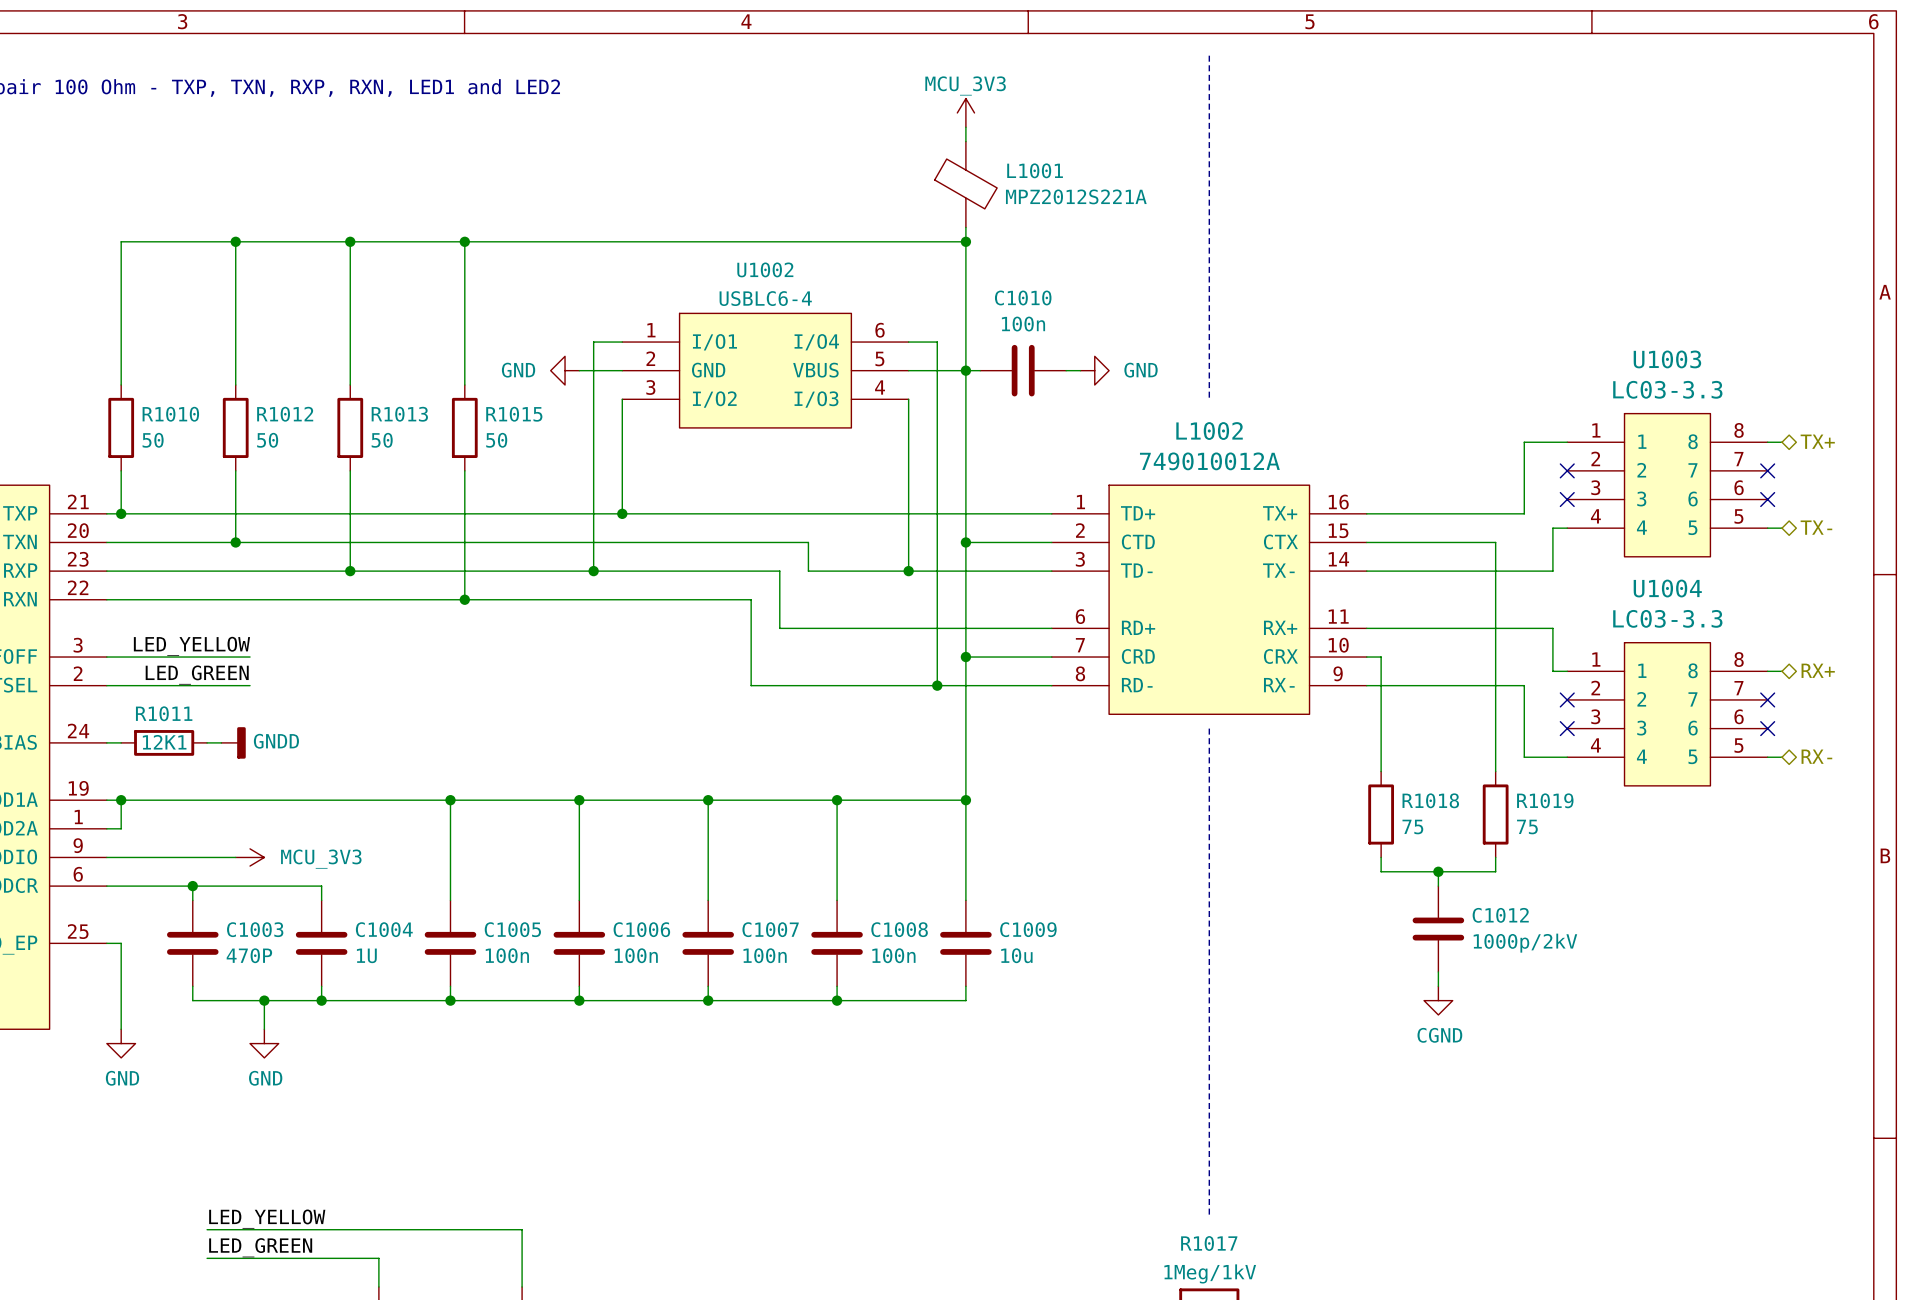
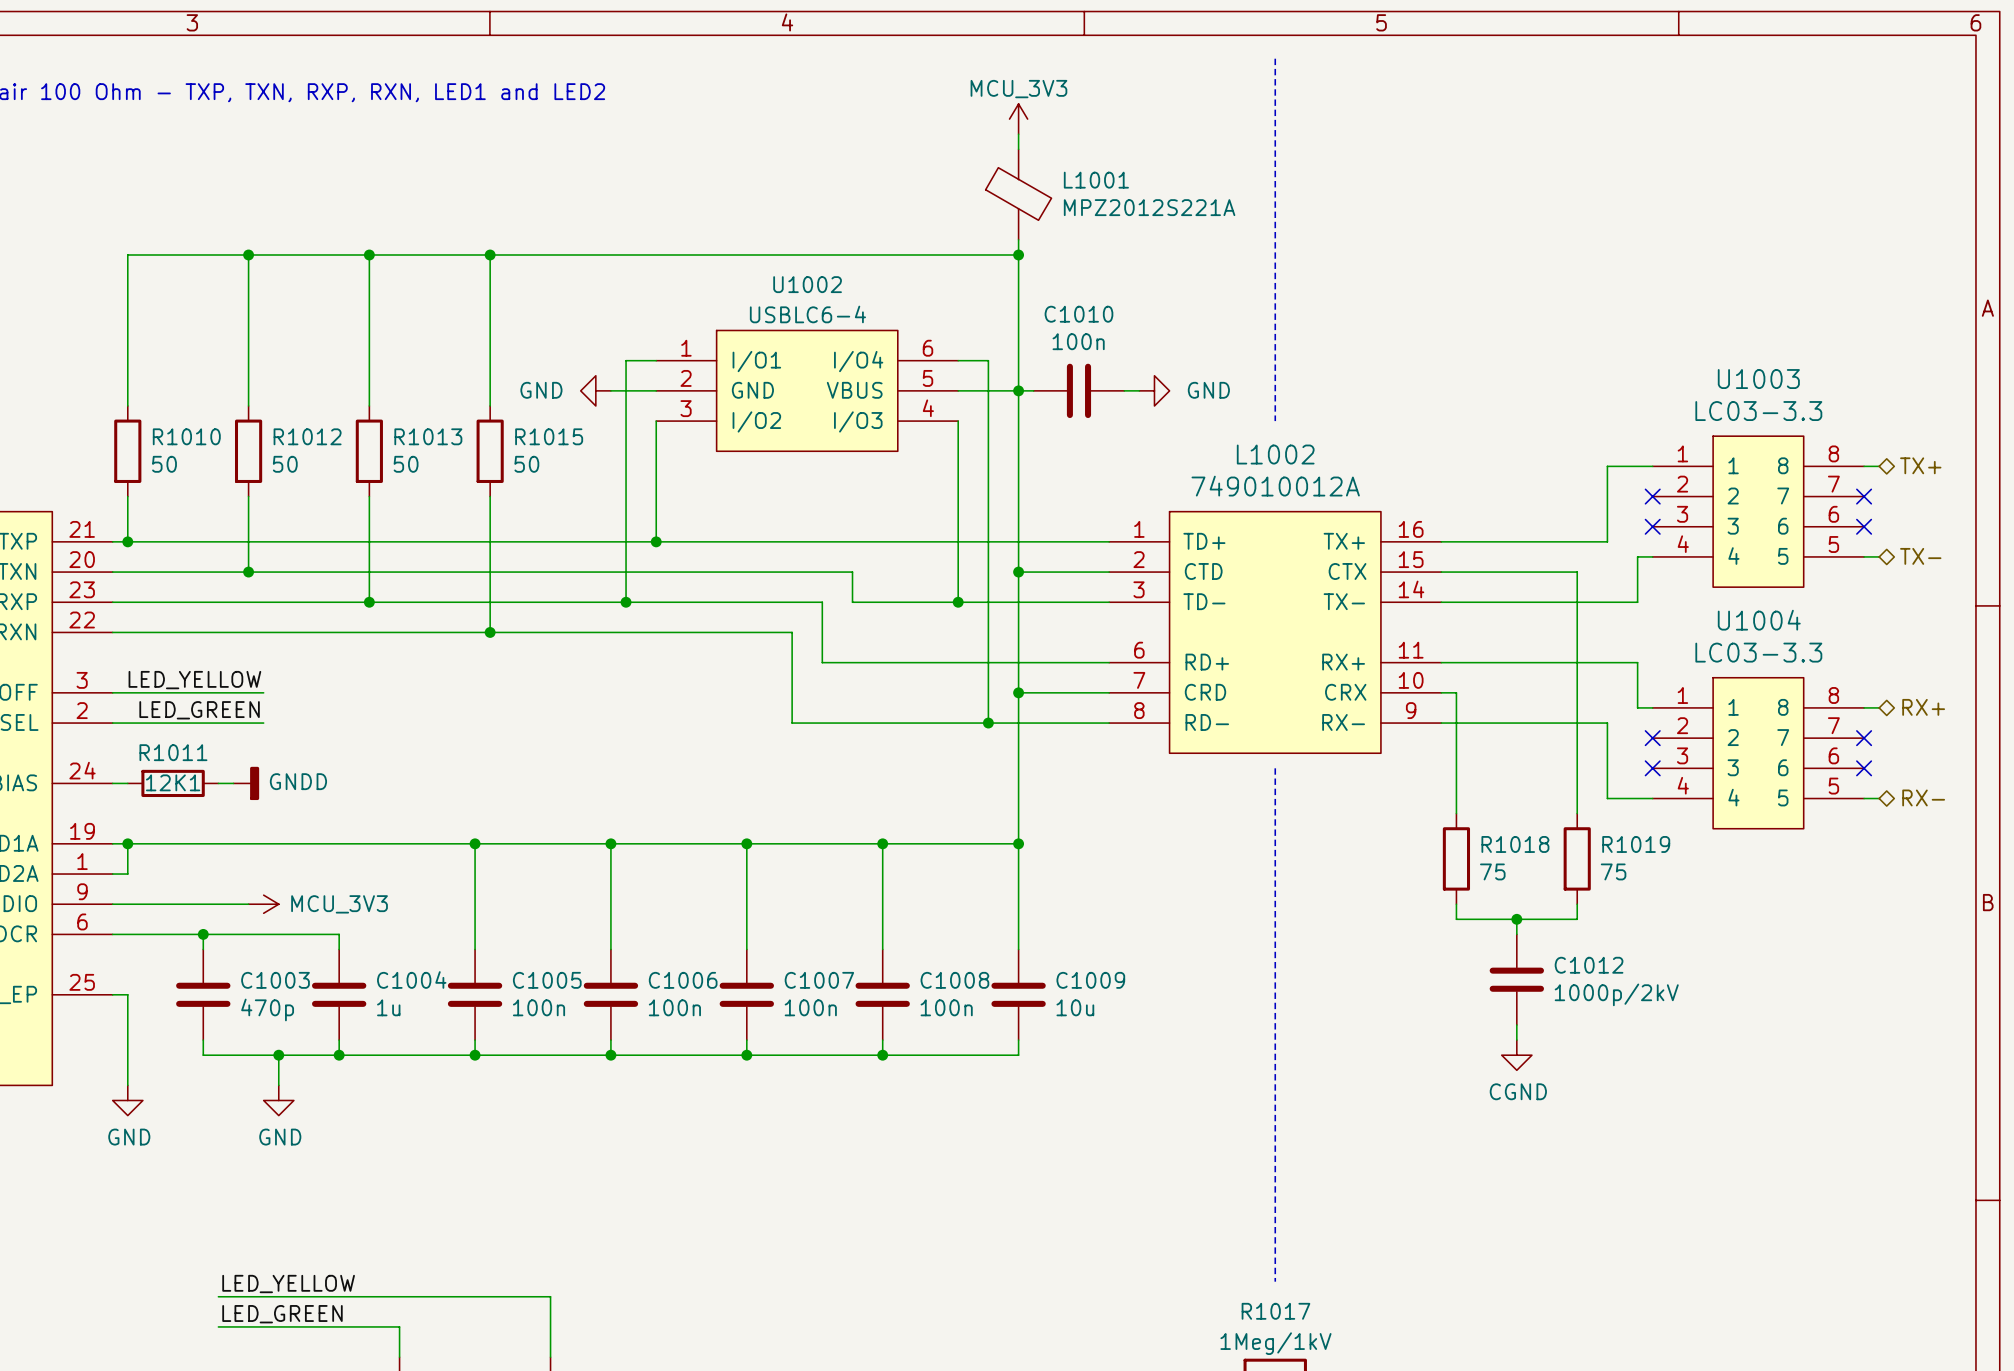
C1003 value: 470P (249, 955) -> 470p (267, 1009)
C1004 value: 1U (366, 955) -> 1u (388, 1007)

